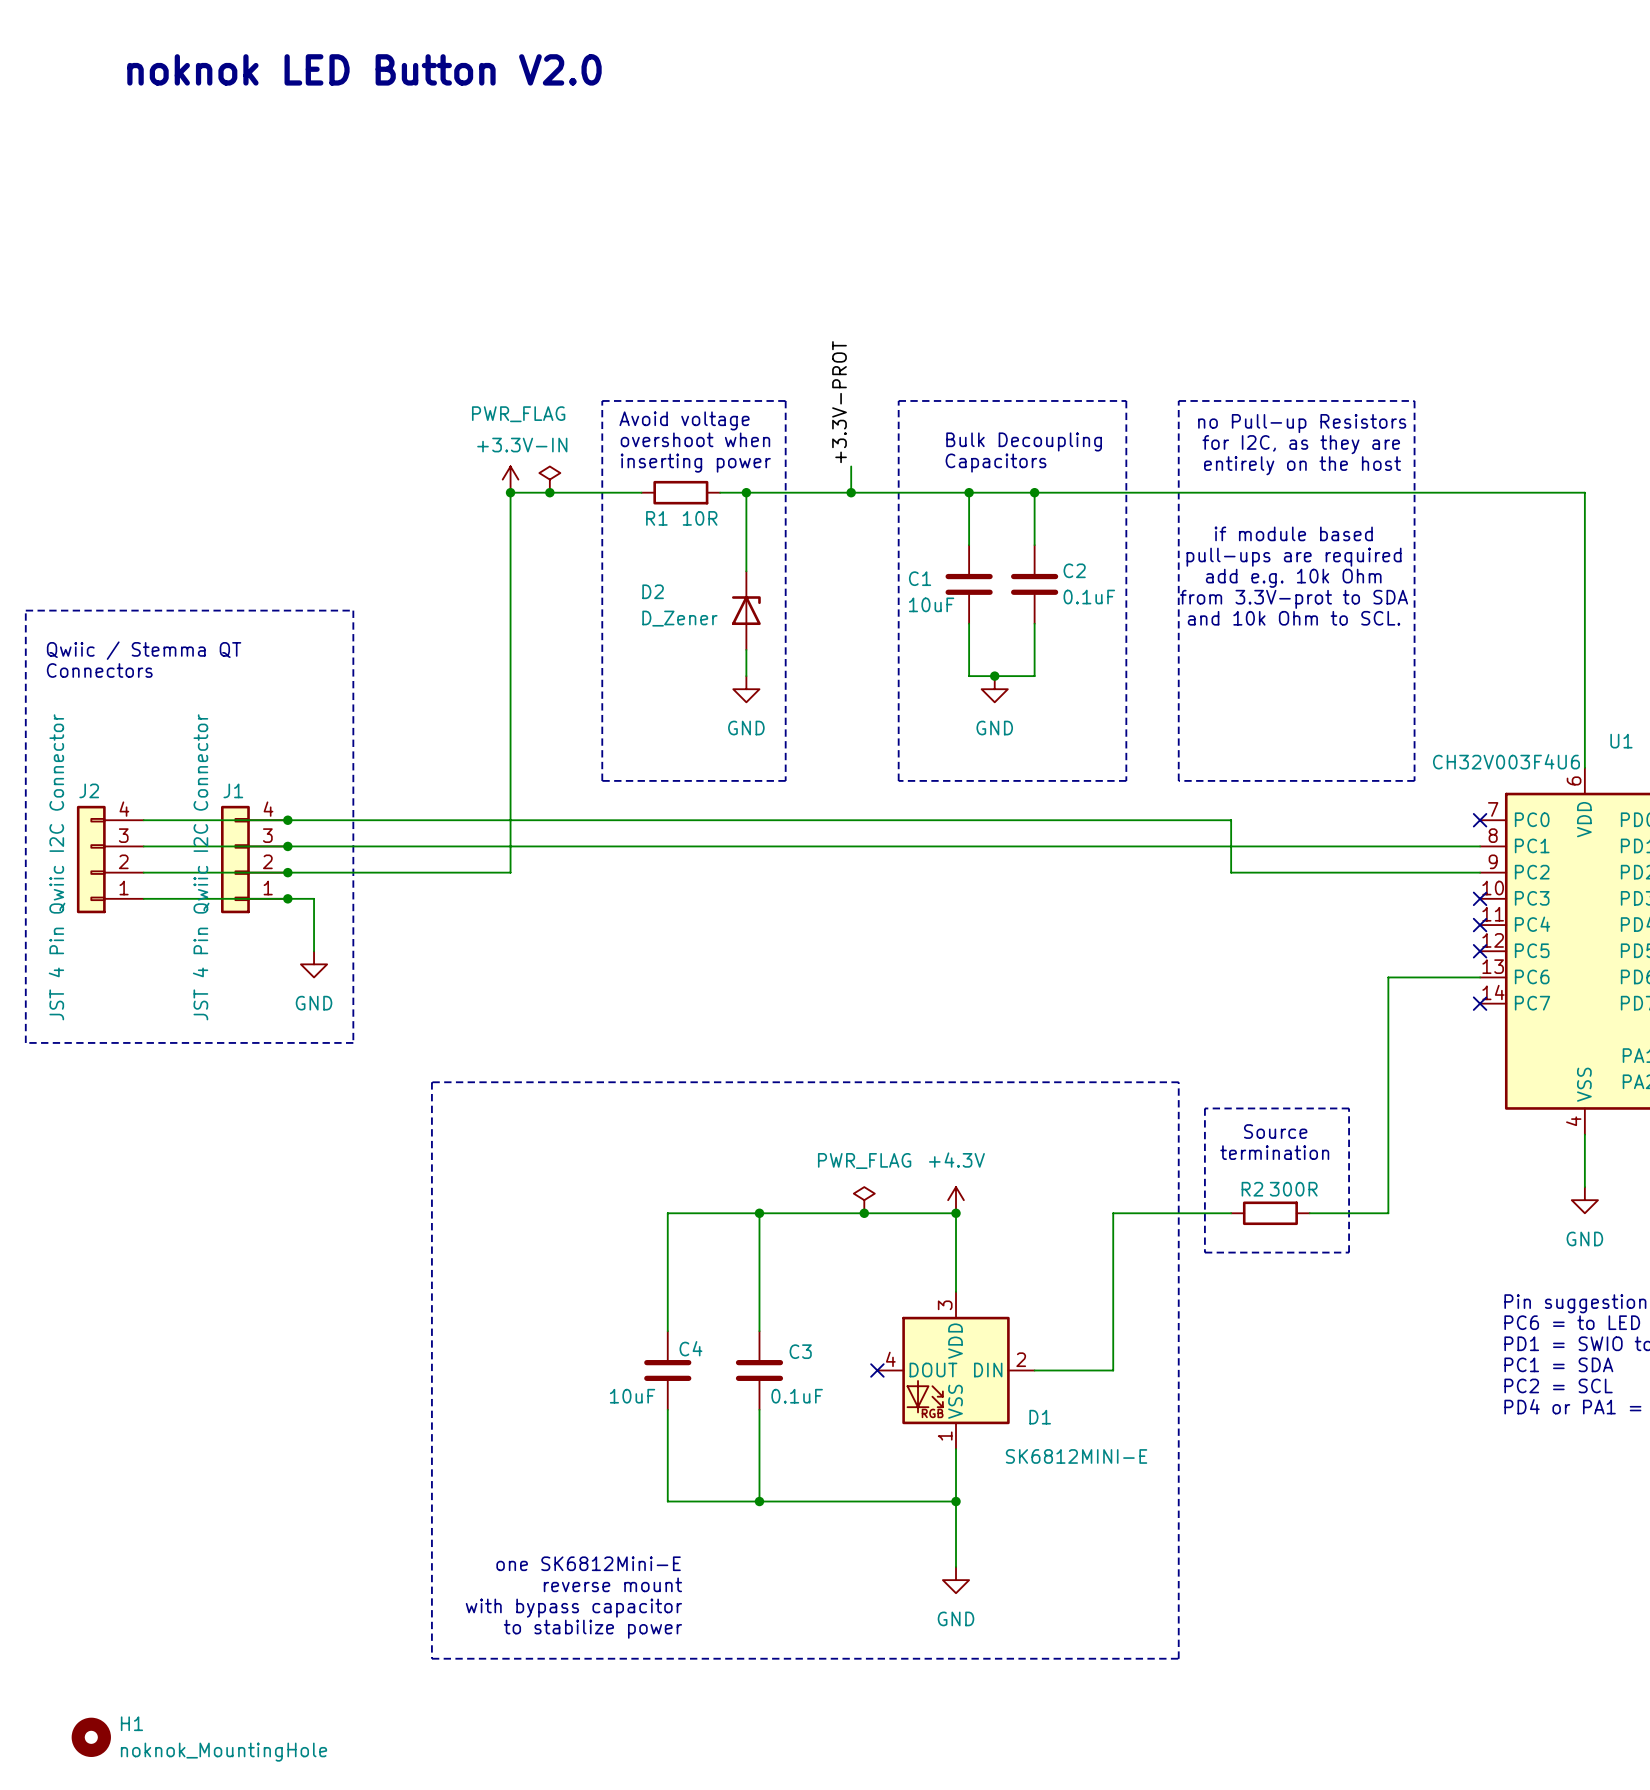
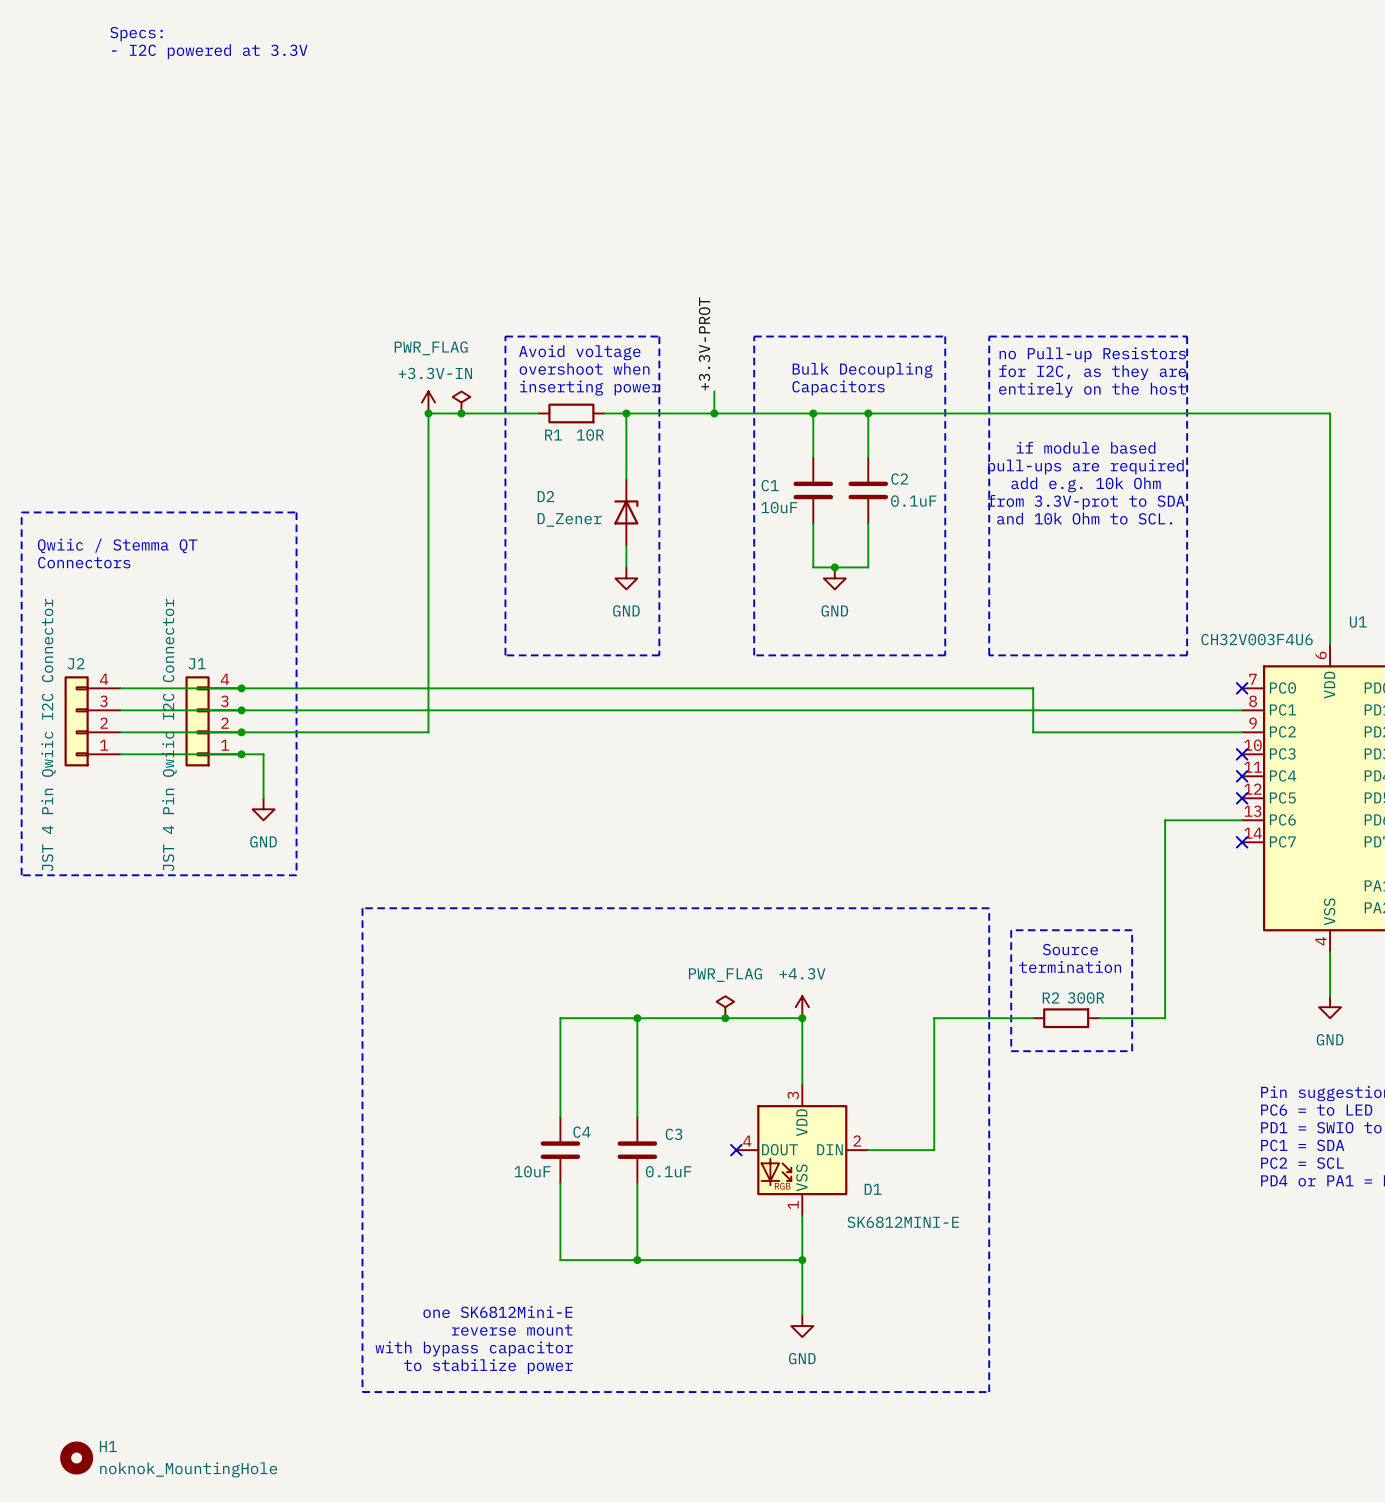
text: none -> Specs: (136, 34)
text: none -> - I2C powered at 3.3V (209, 51)
text: noknok LED Button V2.0 (364, 69) -> none

